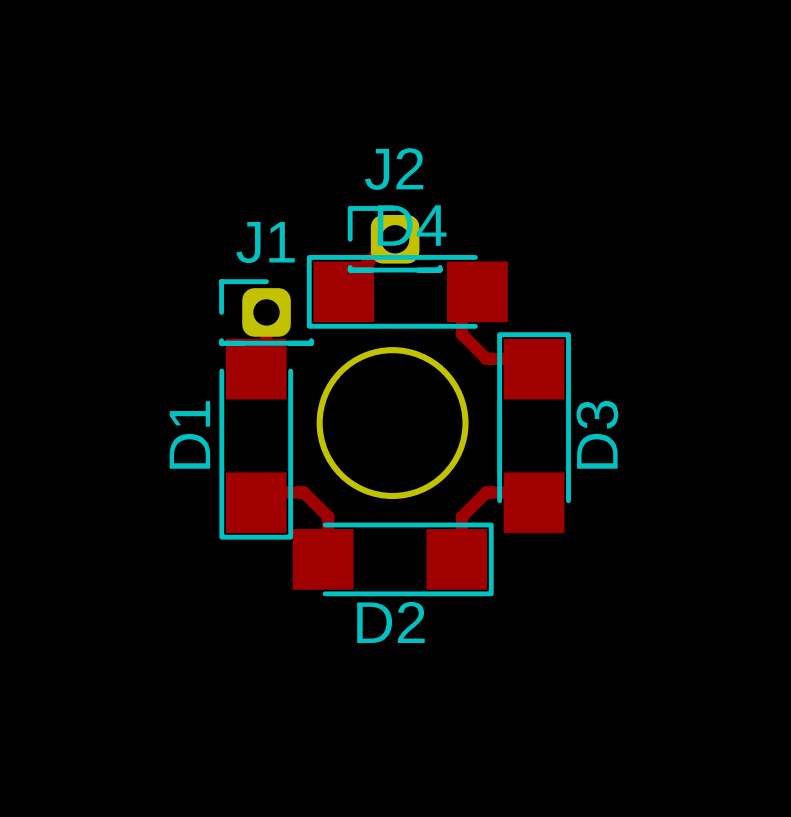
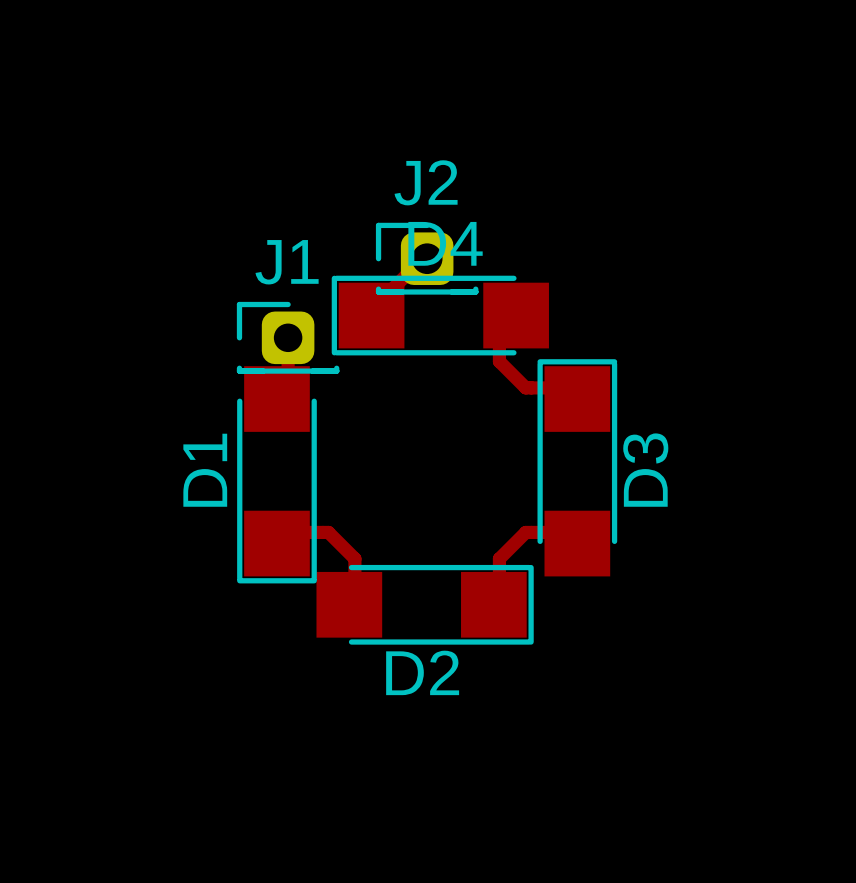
round board edge: [316, 347, 469, 500] -> none

